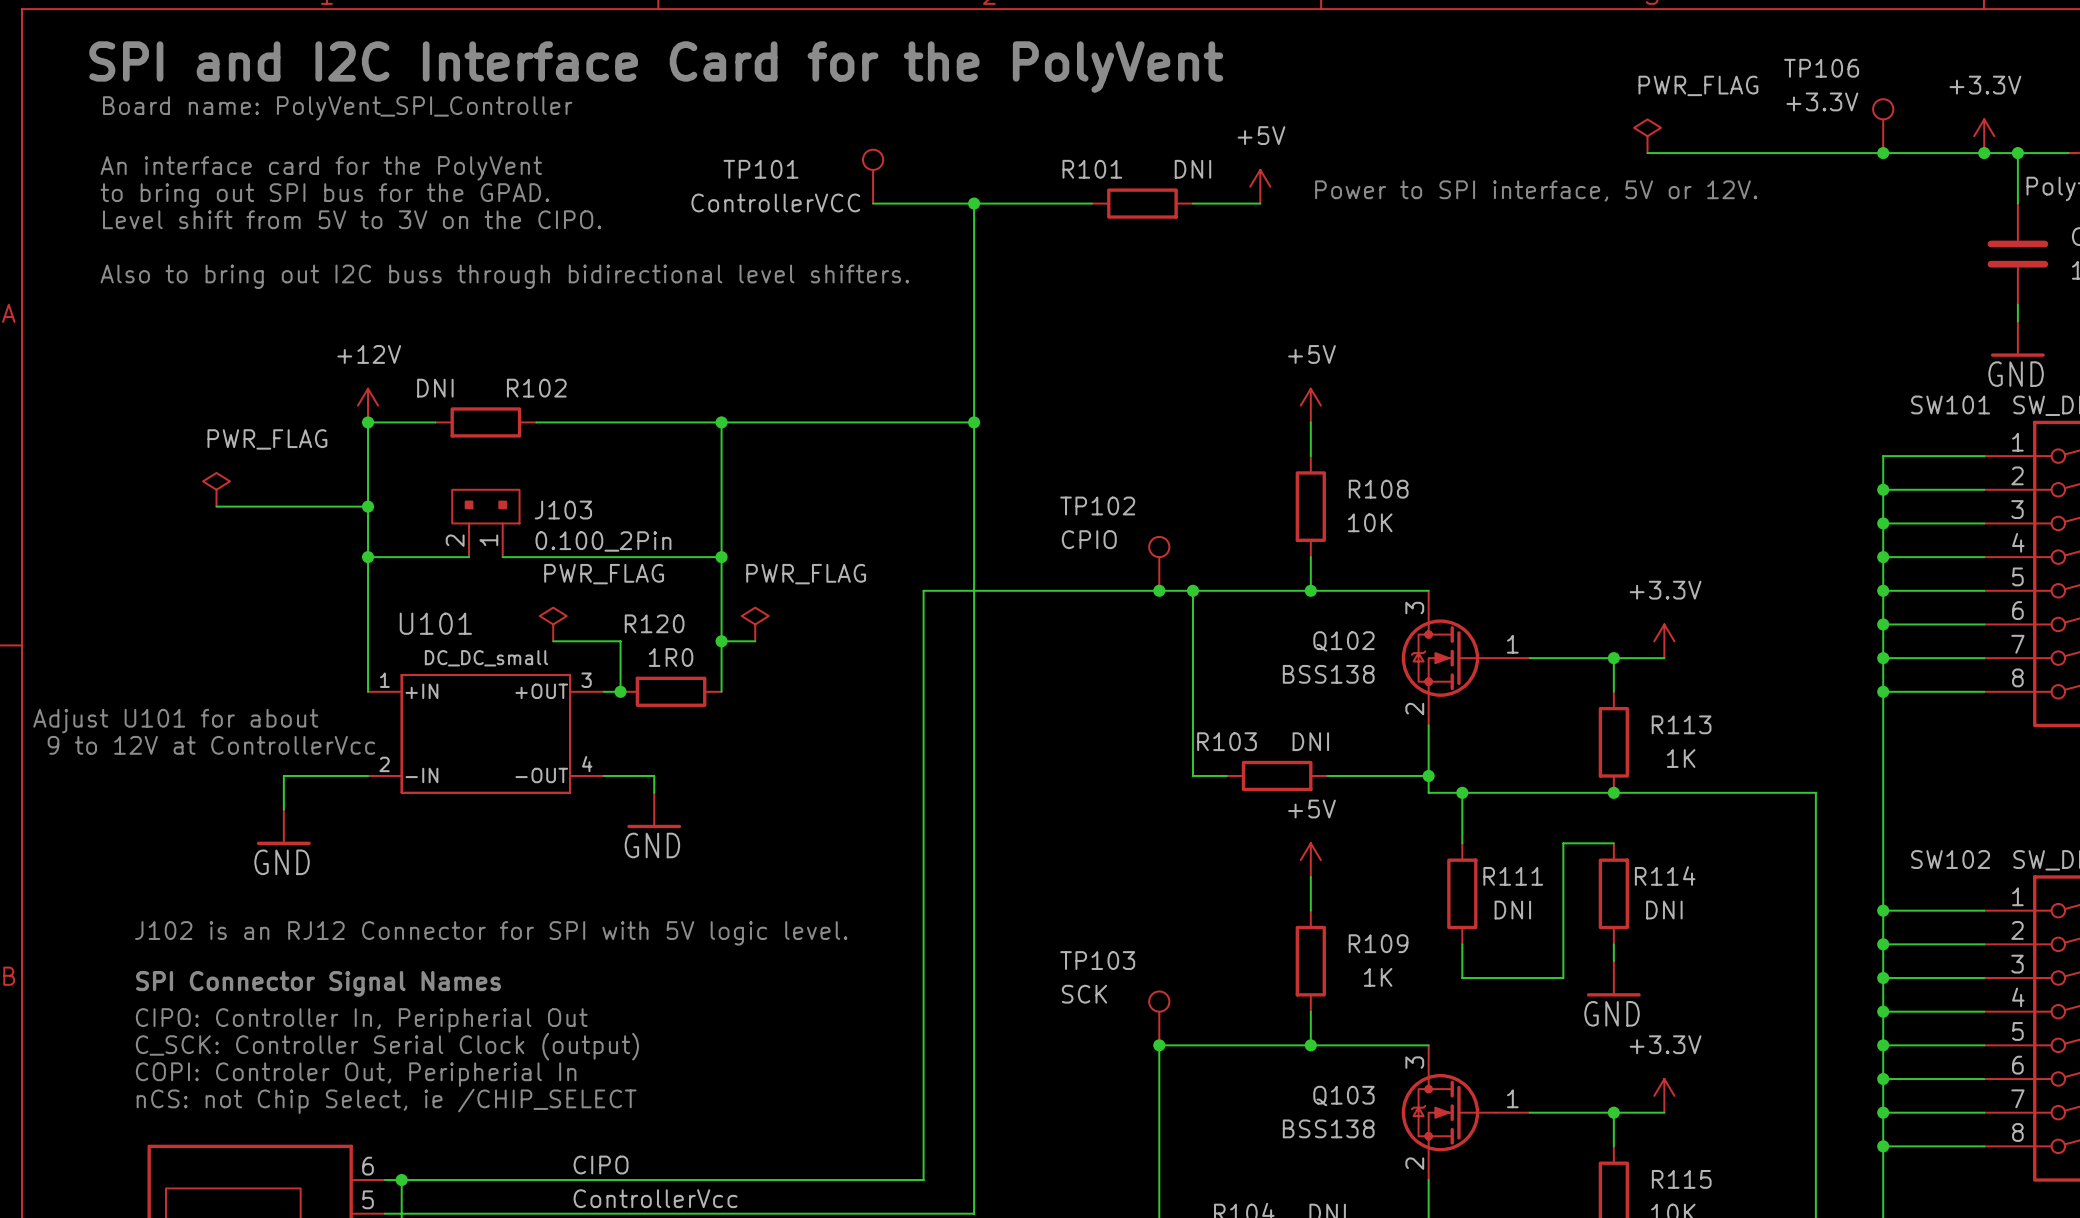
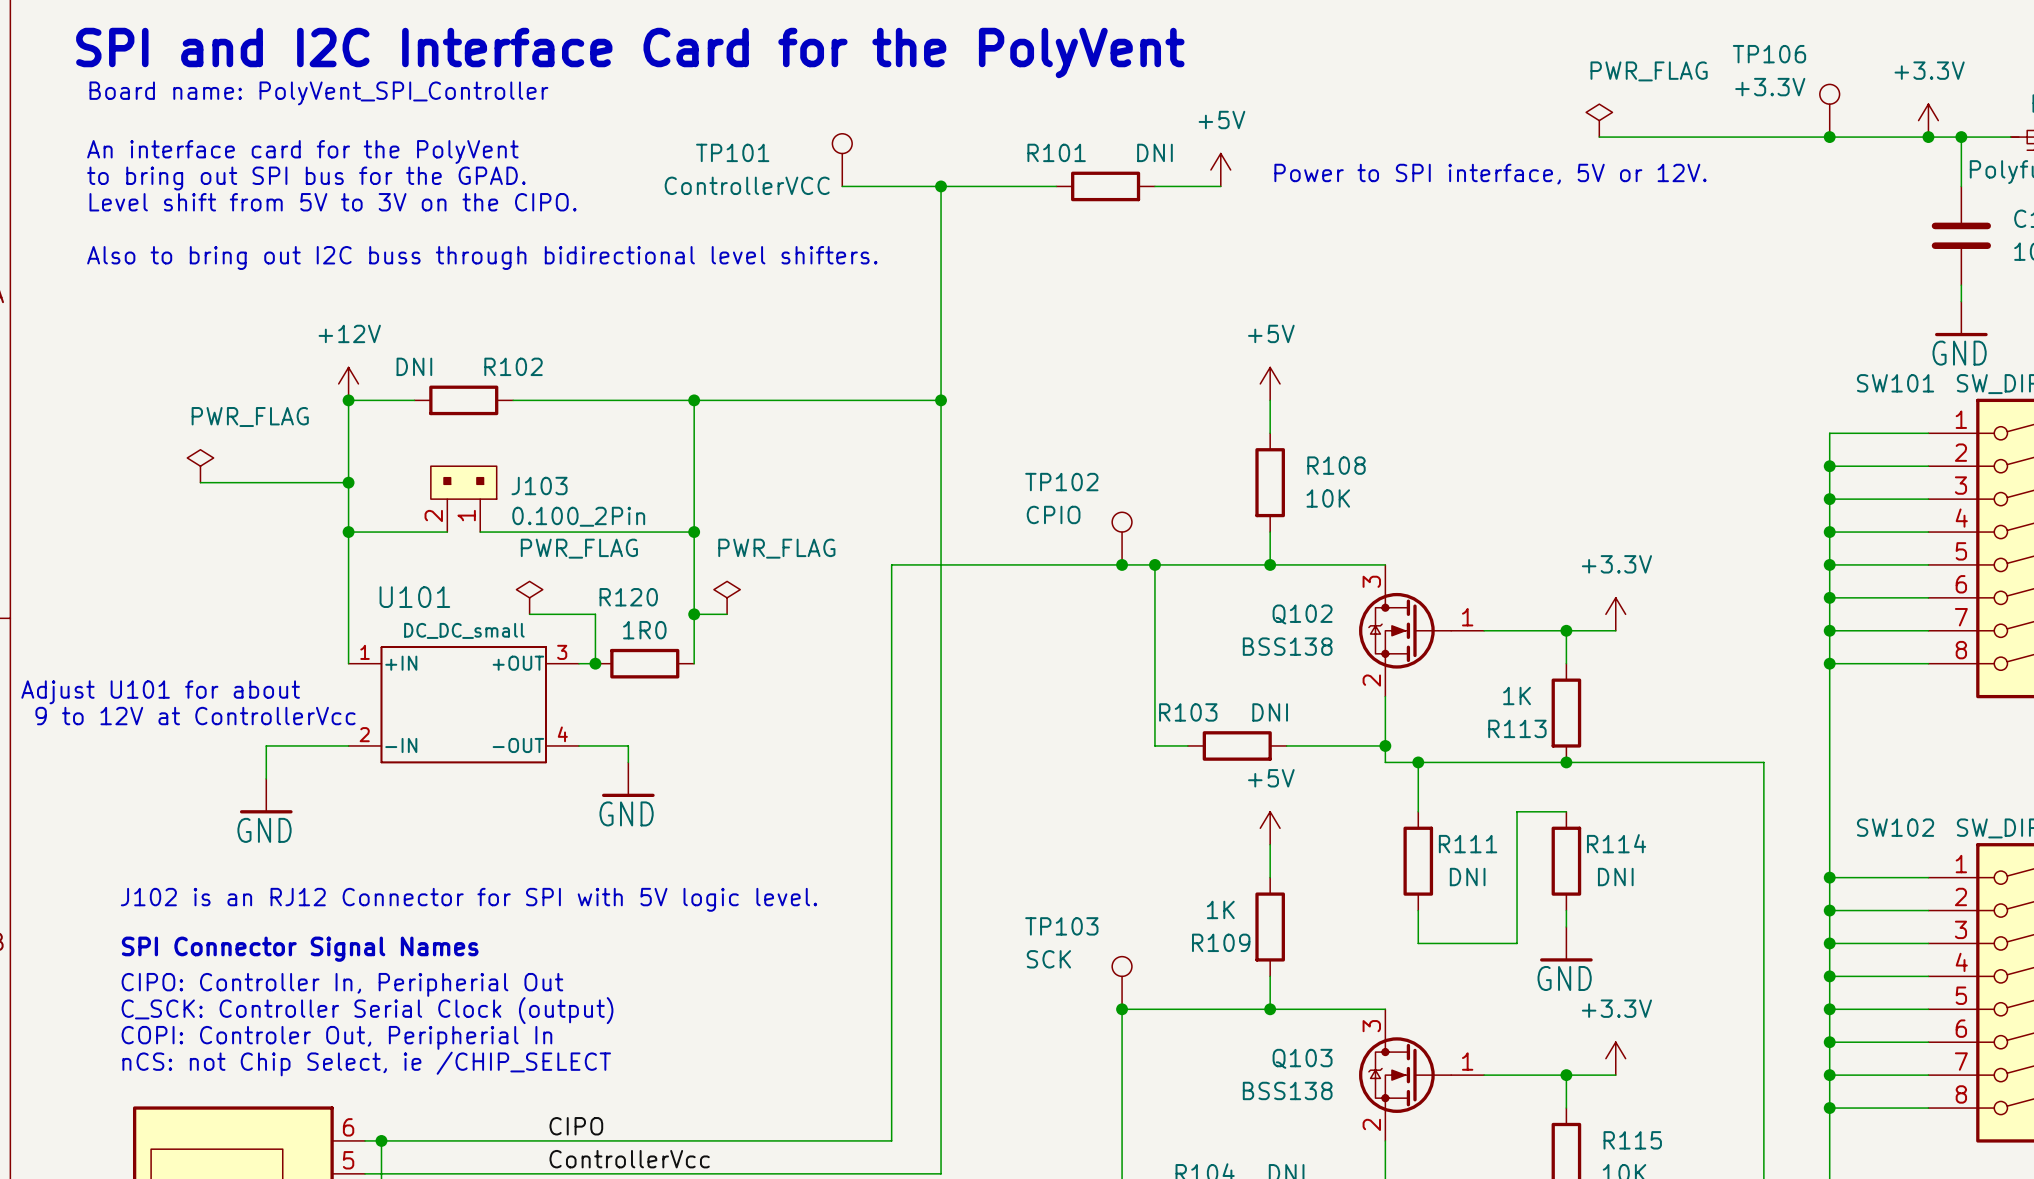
R113 name position: R113 (1681, 724) -> R113 (1517, 728)
R113 value position: 1K (1681, 758) -> 1K (1517, 695)
R109 name position: R109 (1378, 943) -> R109 (1221, 942)
R109 value position: 1K (1378, 977) -> 1K (1220, 909)

